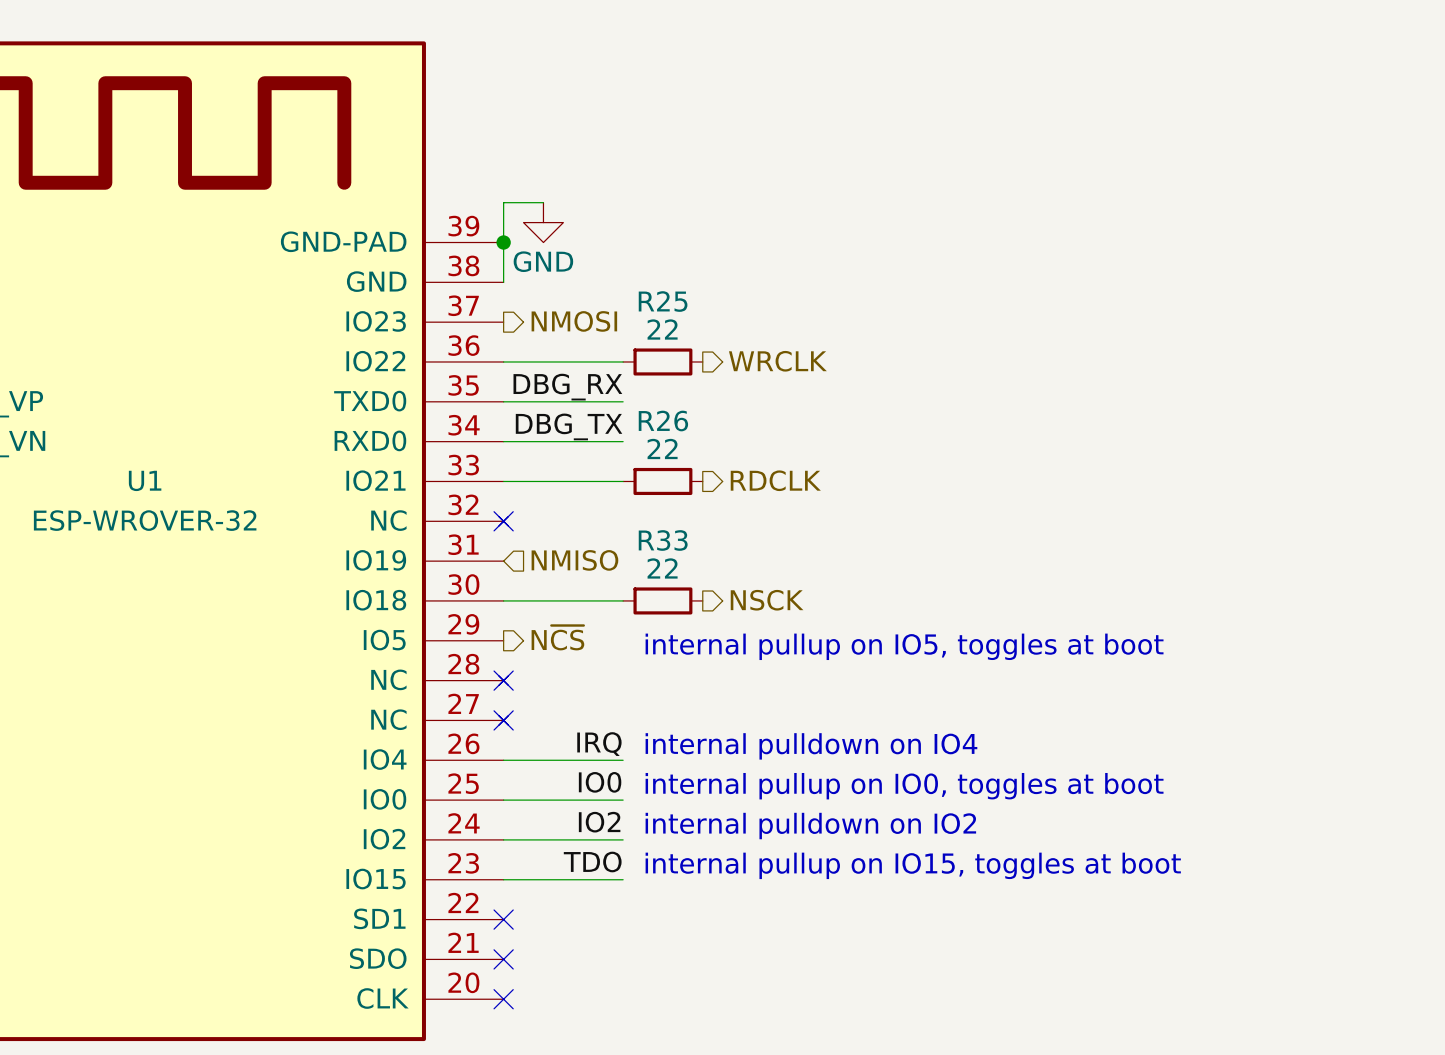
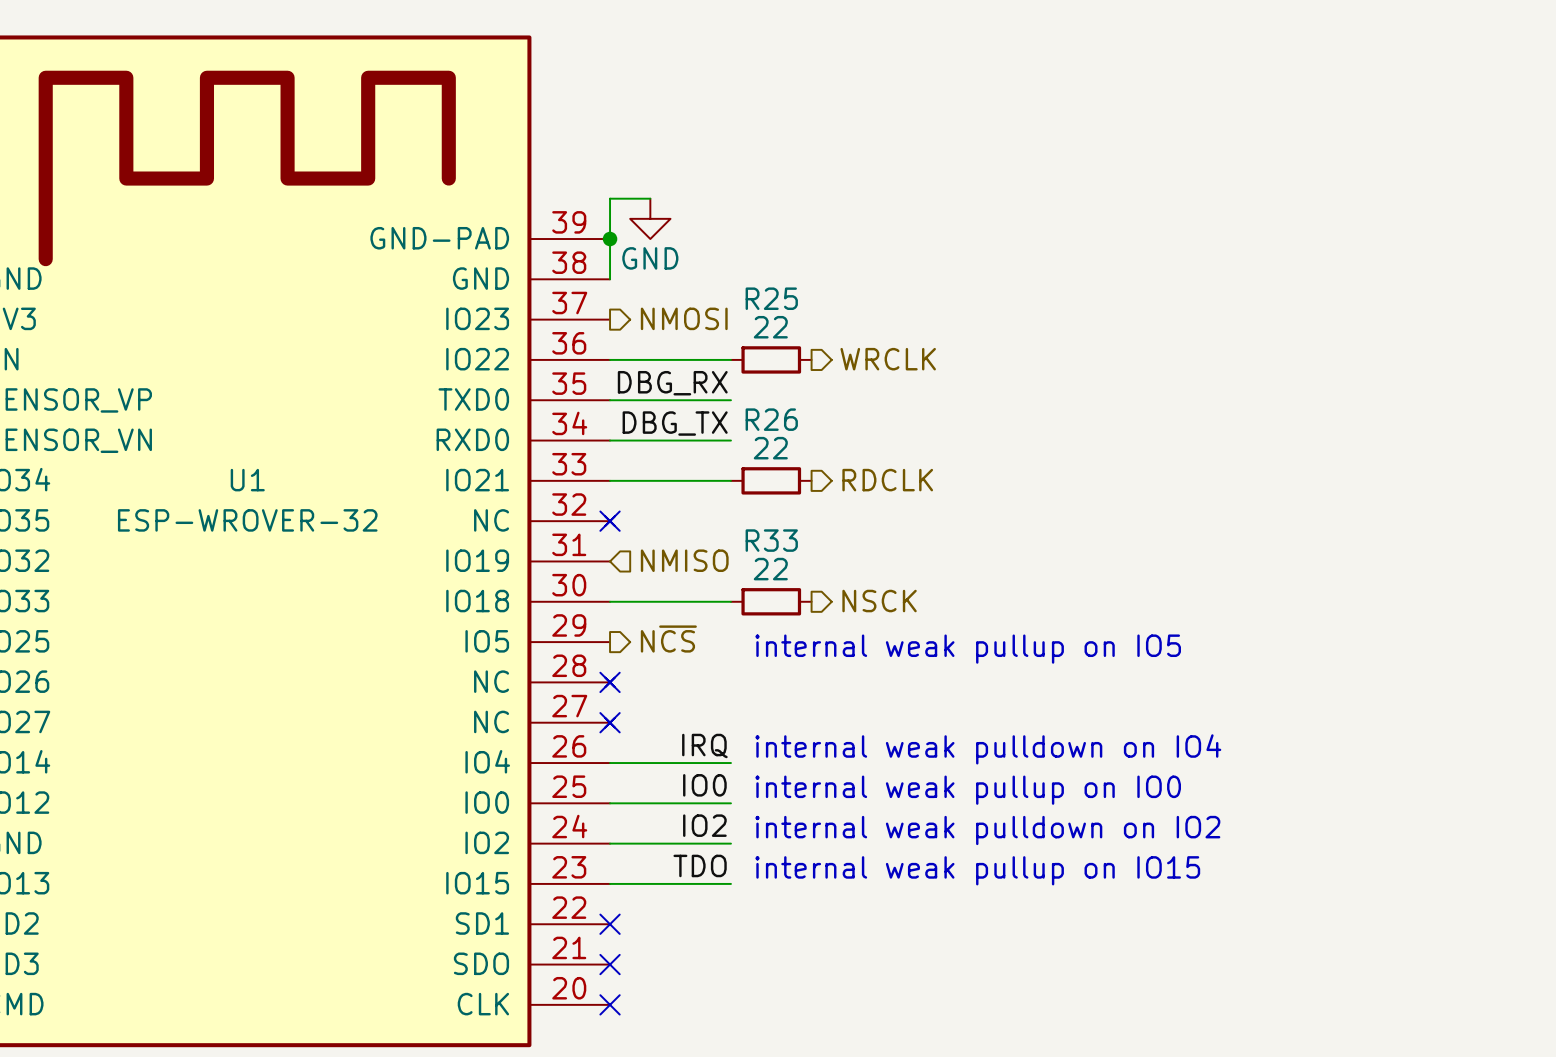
text: internal pullup on IO5, toggles at boot (904, 646) -> internal weak pullup on IO5 (968, 649)
text: internal pulldown on IO4 (811, 746) -> internal weak pulldown on IO4 (988, 749)
text: internal pullup on IO0, toggles at boot (904, 786) -> internal weak pullup on IO0 (968, 790)
text: internal pulldown on IO2 (810, 826) -> internal weak pulldown on IO2 (987, 830)
text: internal pullup on IO15, toggles at boot (913, 865) -> internal weak pullup on IO15 (977, 870)

